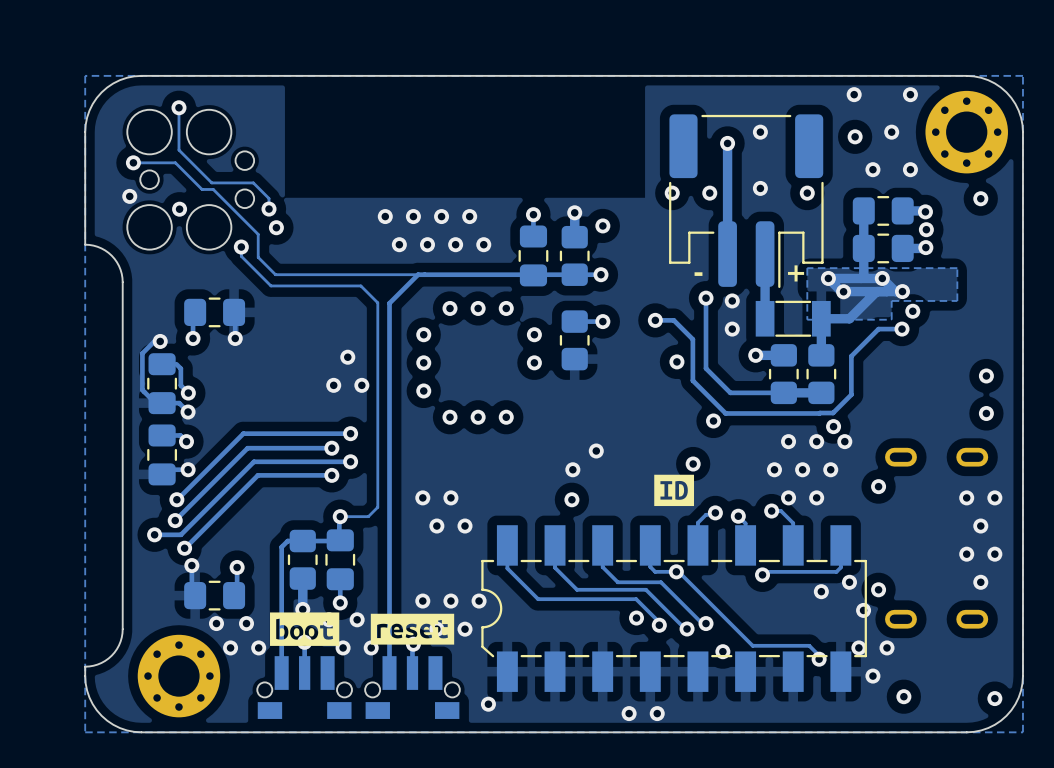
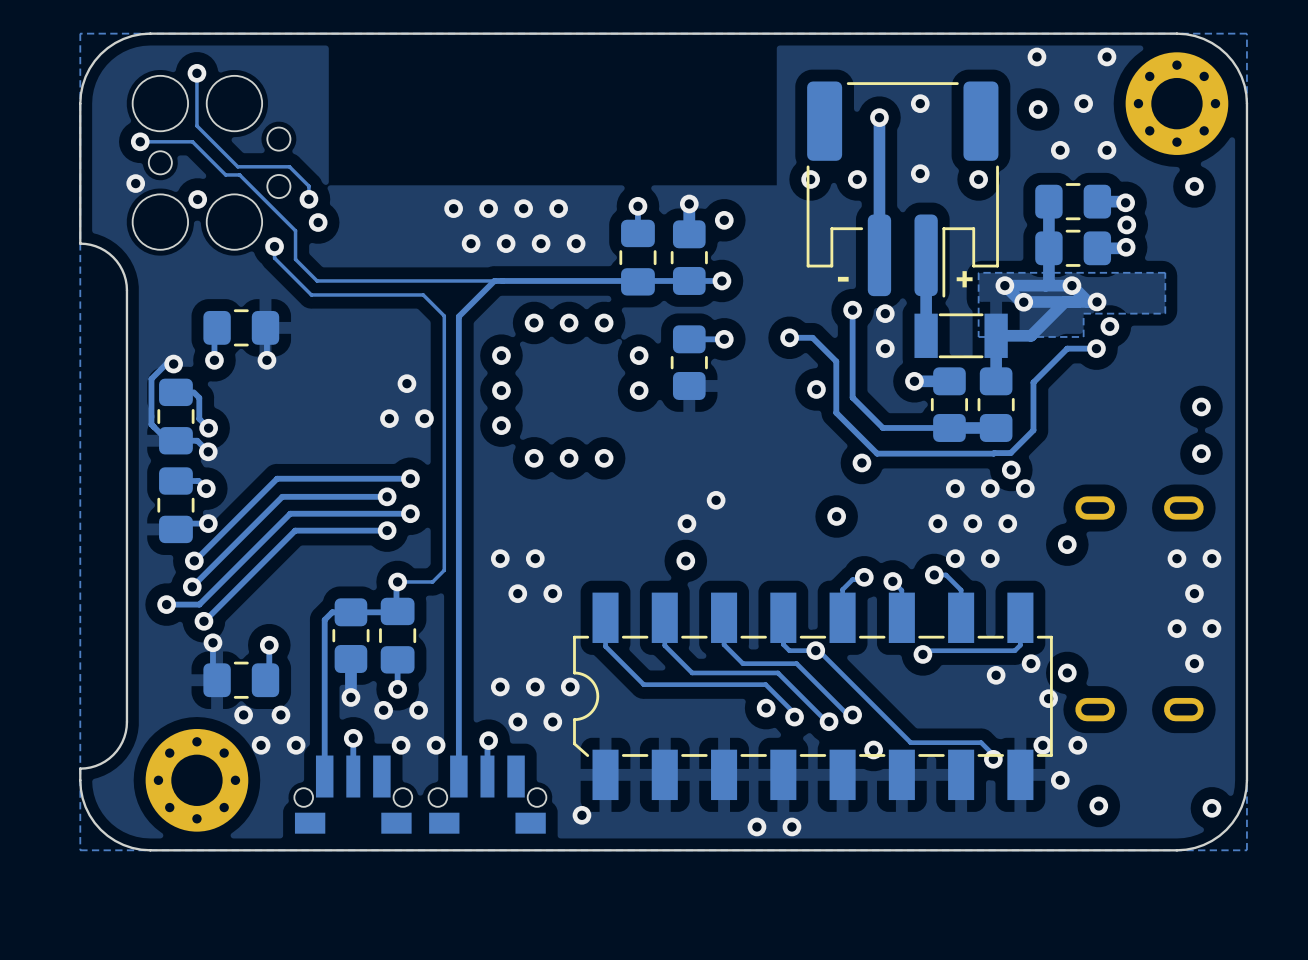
drawing: [654, 474, 695, 507] -> none
drawing: [270, 612, 340, 646] -> none
drawing: [370, 613, 455, 645] -> none

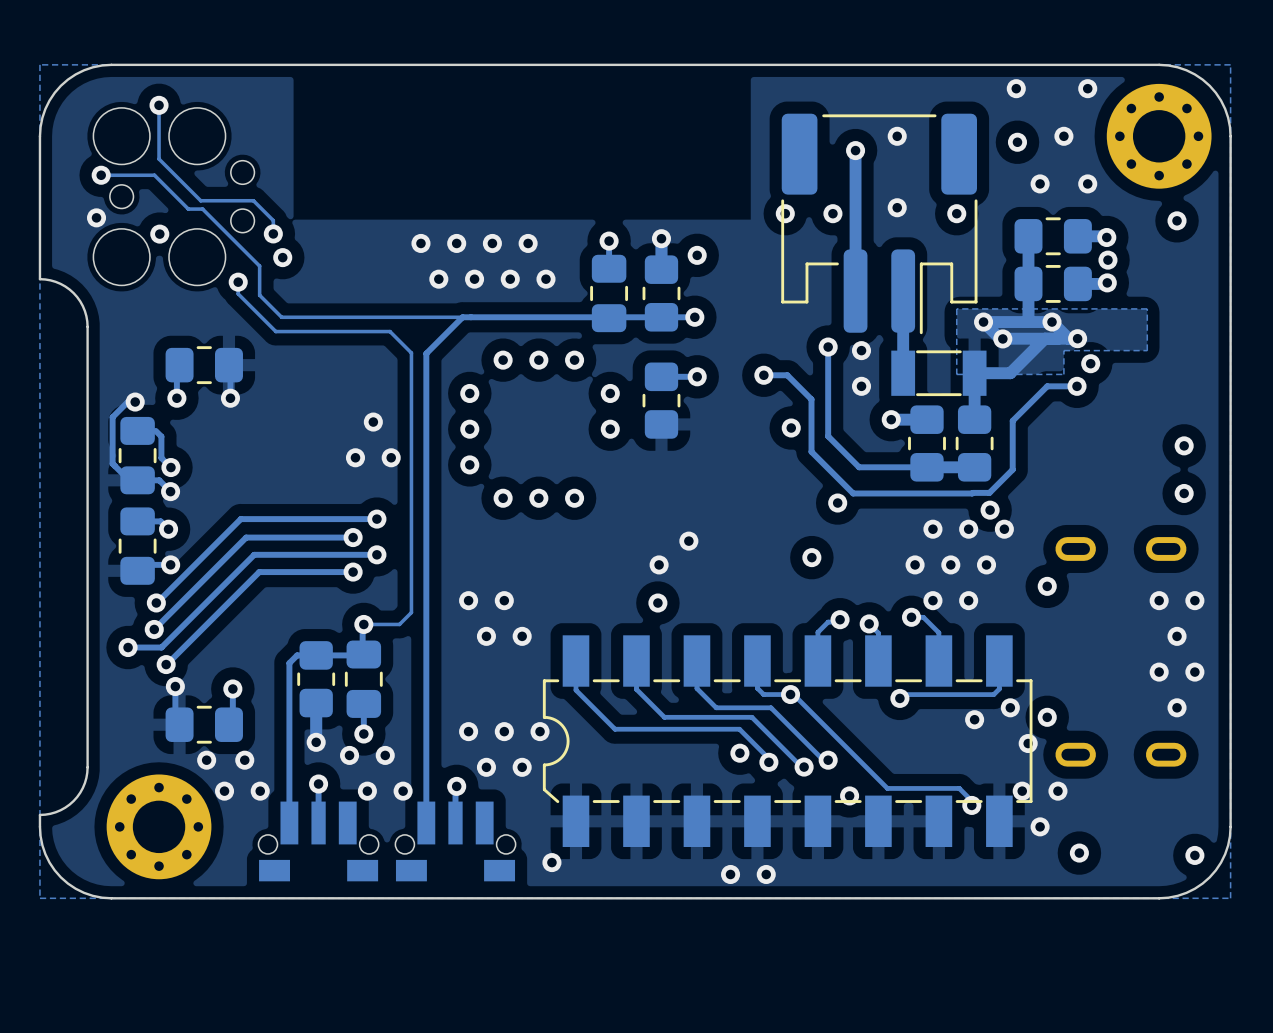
text: - (843, 279) -> none
text: + (964, 279) -> none

